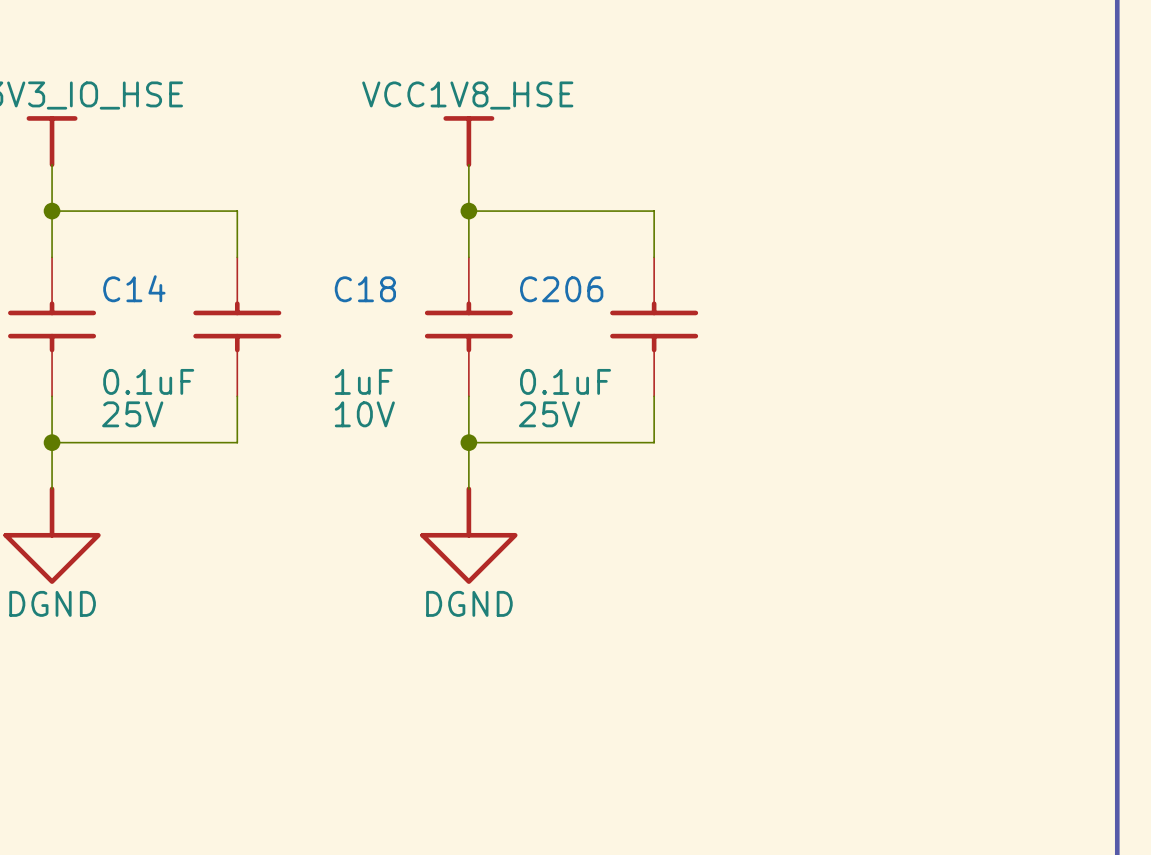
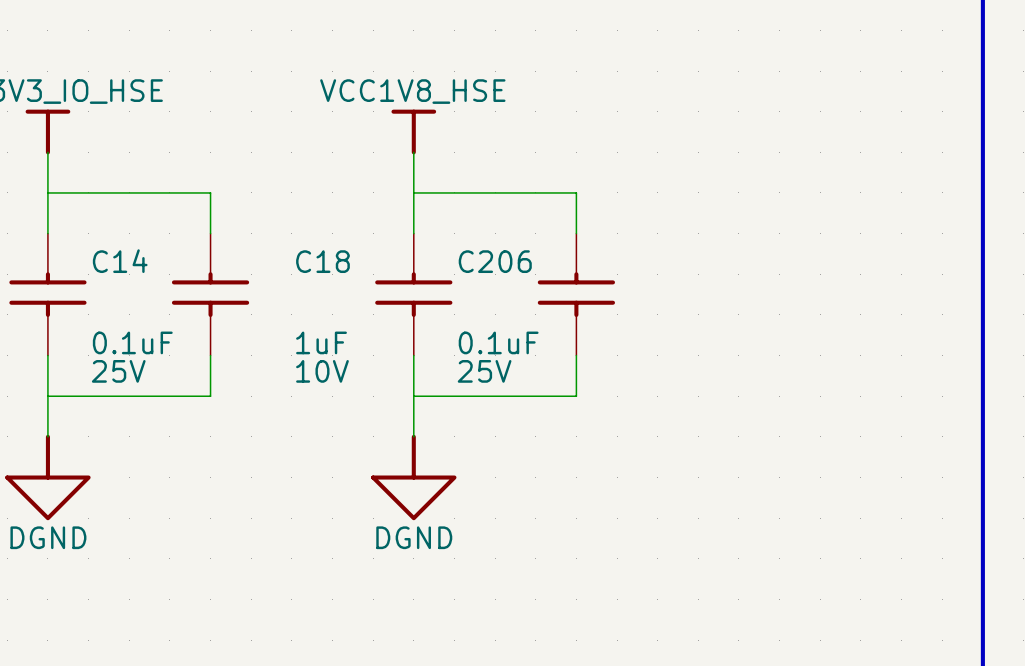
junction: (52, 211) -> none
junction: (468, 211) -> none
junction: (52, 442) -> none
junction: (468, 442) -> none

